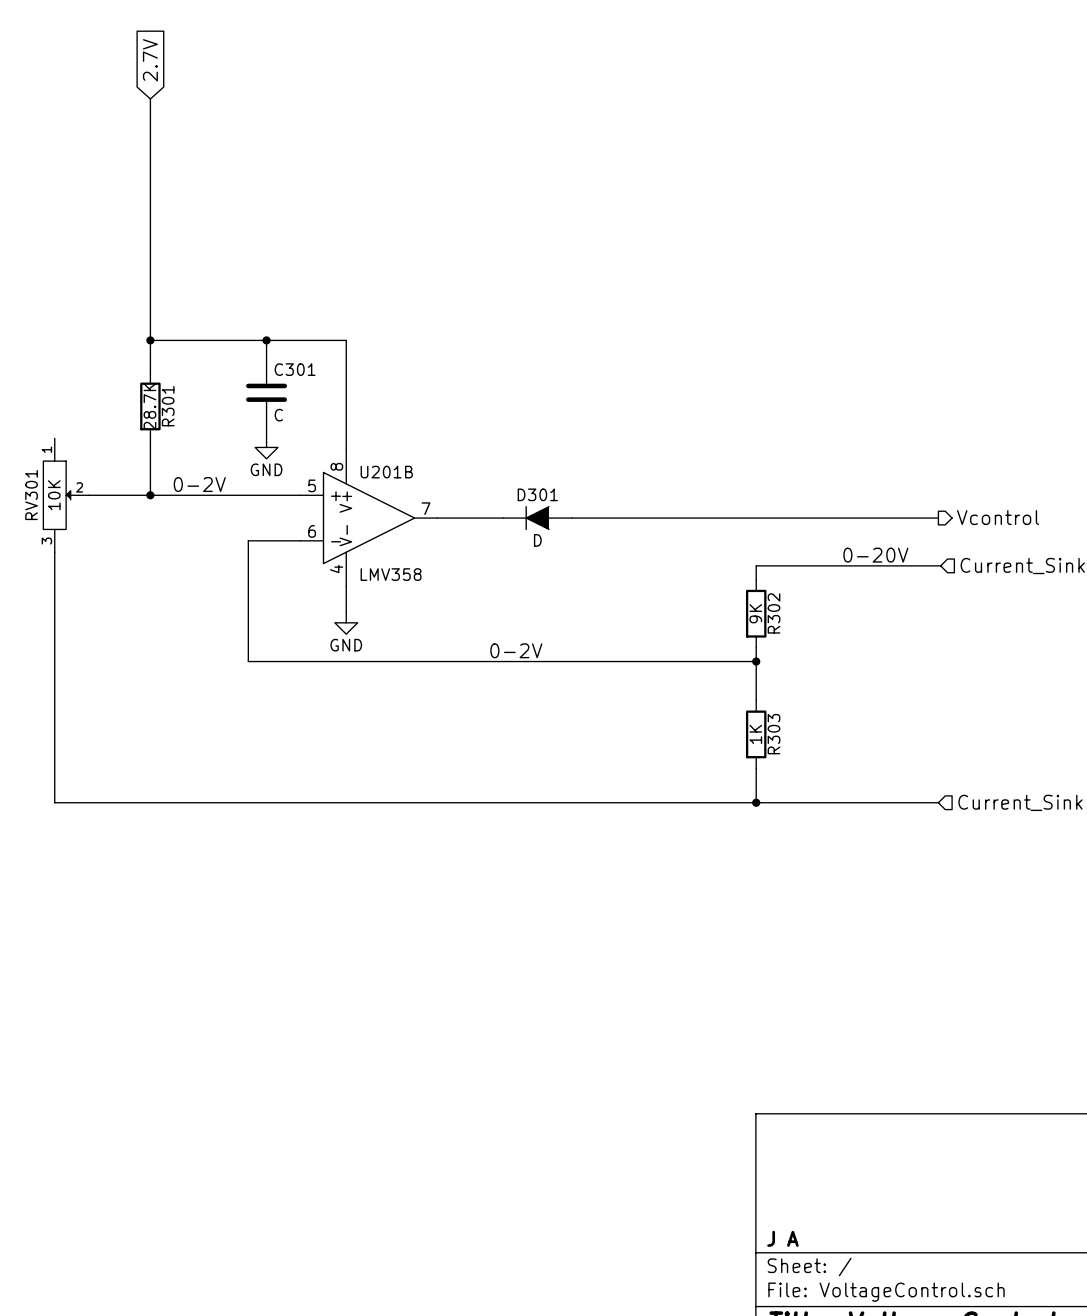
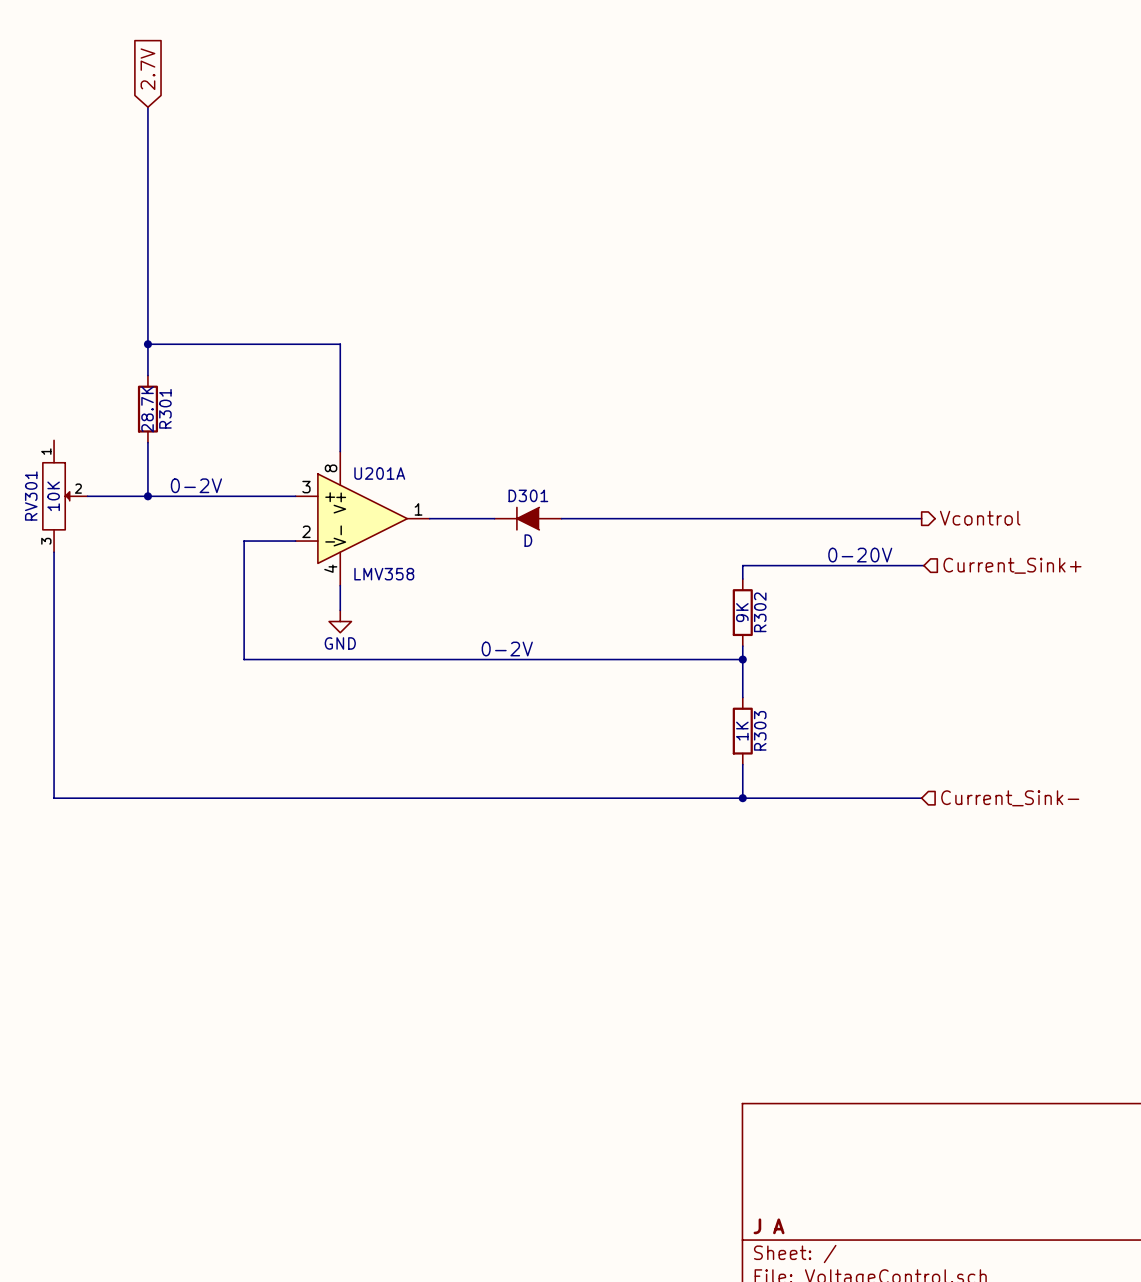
wire: (266, 340) (266, 358) -> none
junction: (266, 340) -> none
C301: C (266, 392) -> none
wire: (266, 426) (266, 436) -> none
power symbol: GND (266, 447) -> none
U201B name: U201B (386, 472) -> U201A (379, 473)
U201B pin number: 5 (312, 485) -> 3 (306, 487)
U201B pin number: 7 (425, 508) -> 1 (418, 509)
U201B pin number: 6 (312, 531) -> 2 (306, 531)

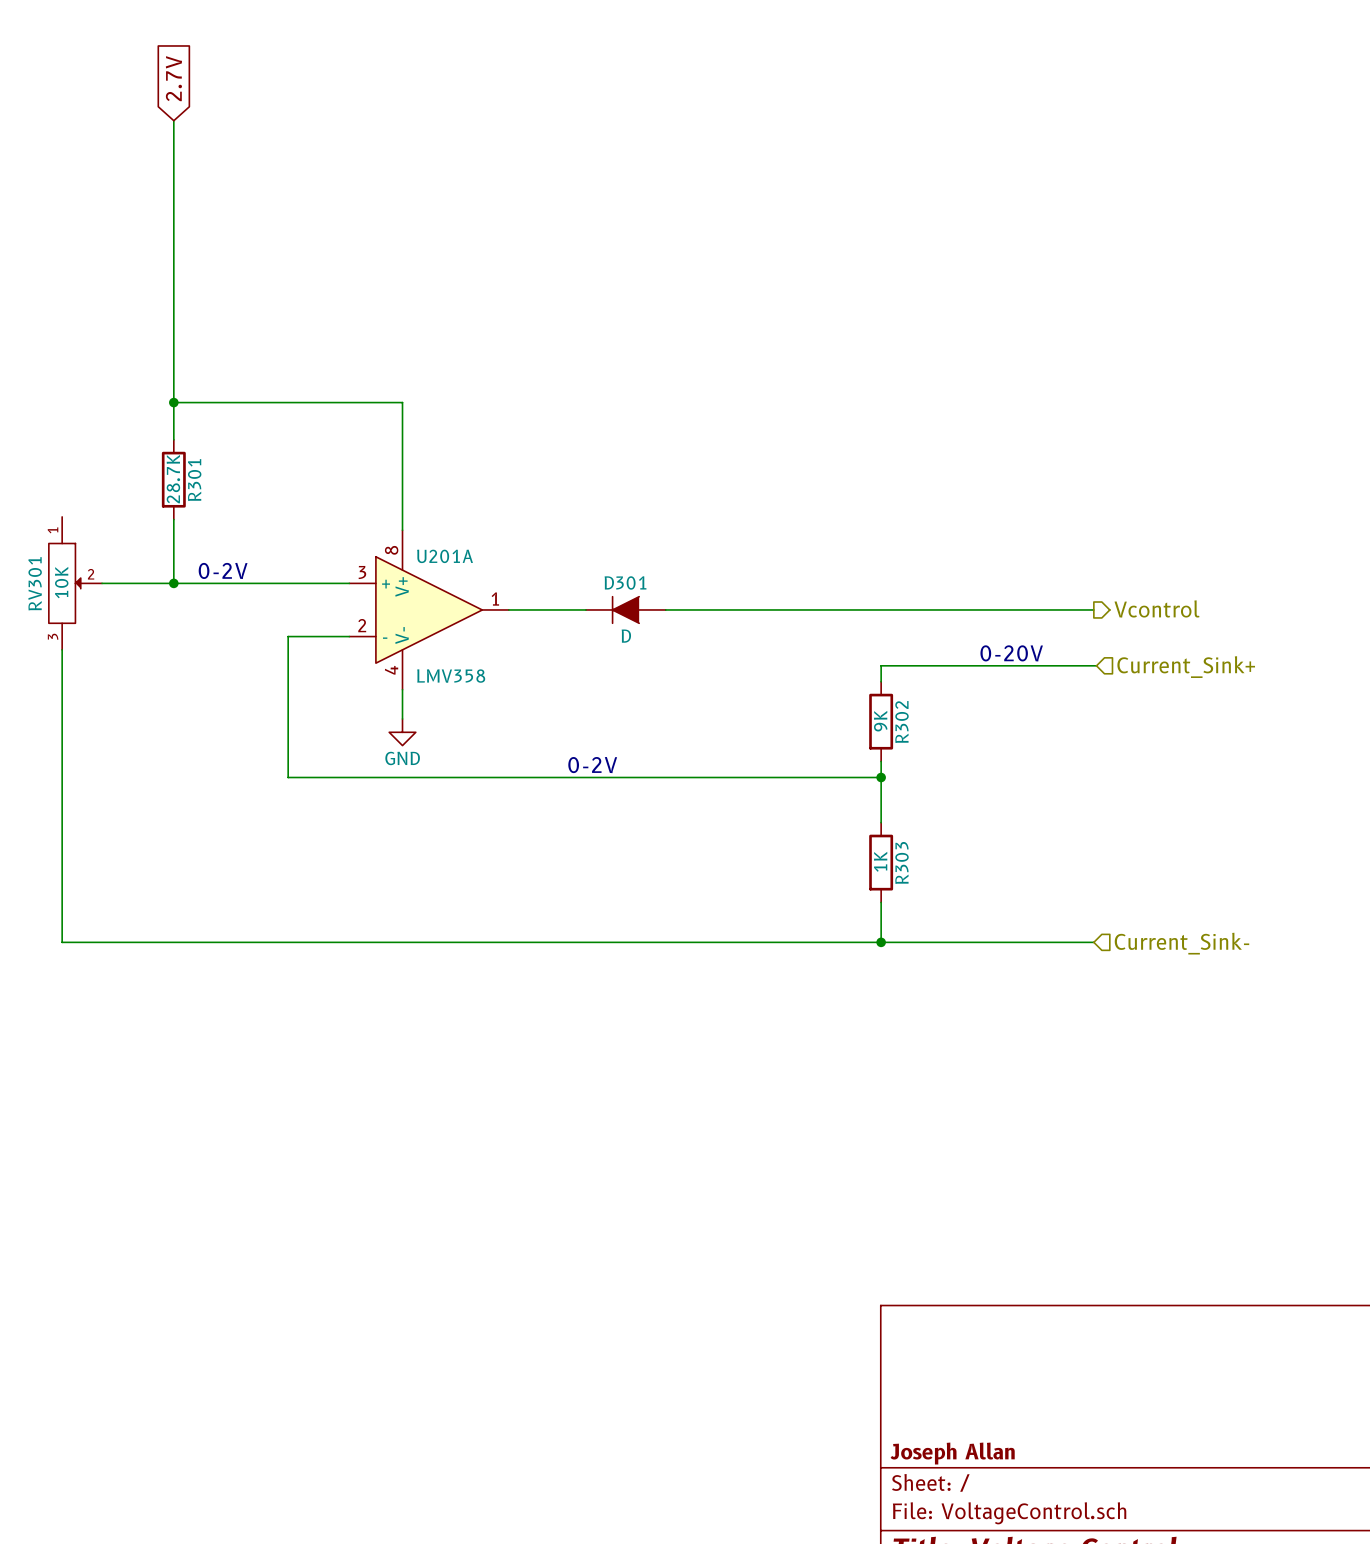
title block: J A (769, 1226) -> Joseph Allan (952, 1453)

